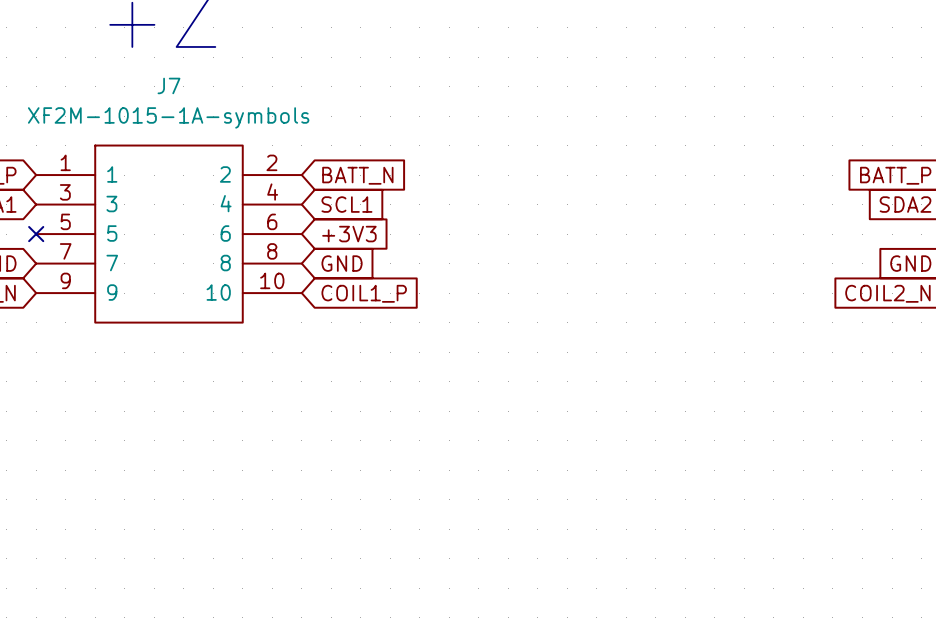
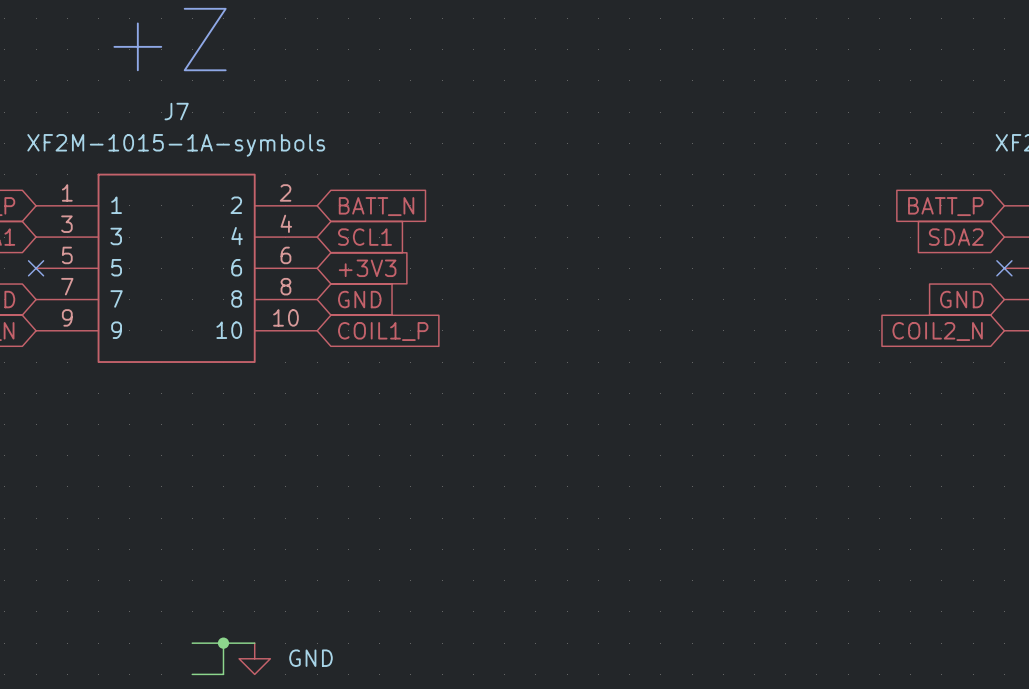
wire: none -> (192, 643) (254, 643)
wire: none -> (223, 643) (223, 674) (192, 674)
junction: none -> (223, 643)
power symbol: none -> GND (254, 658)

